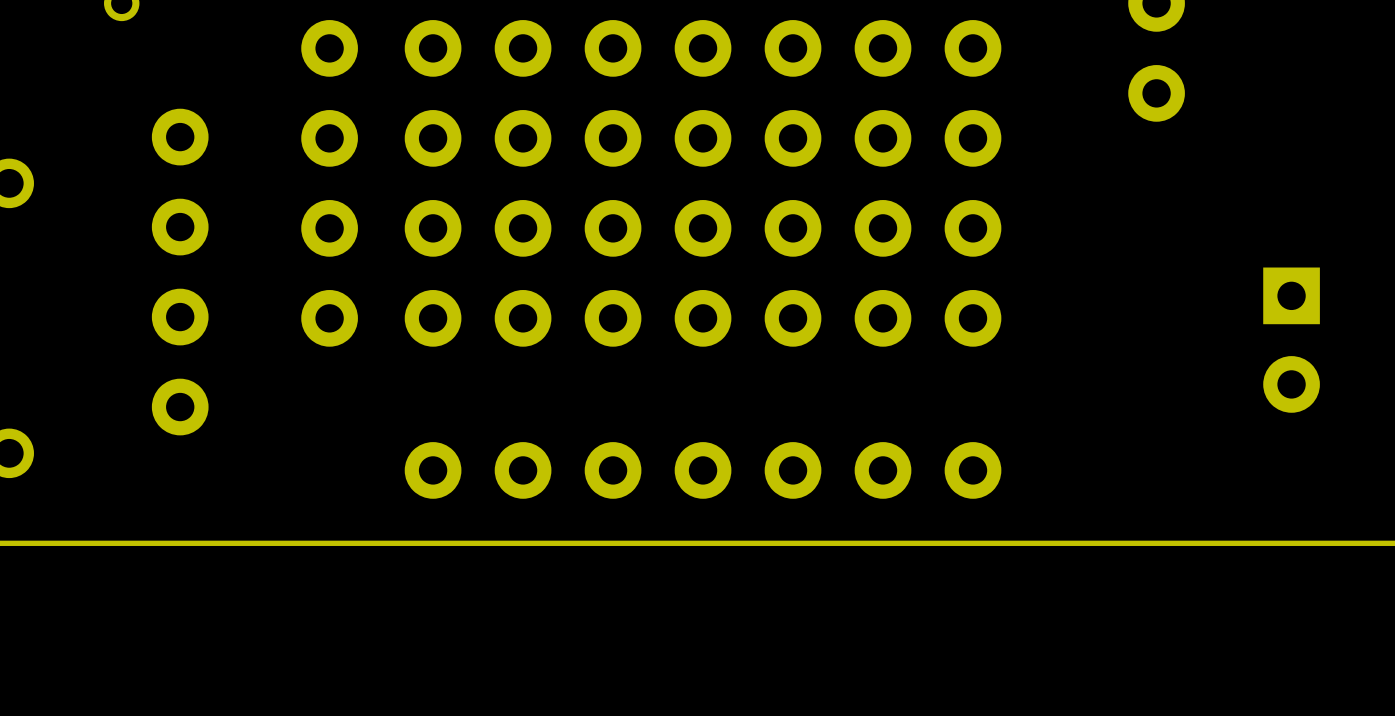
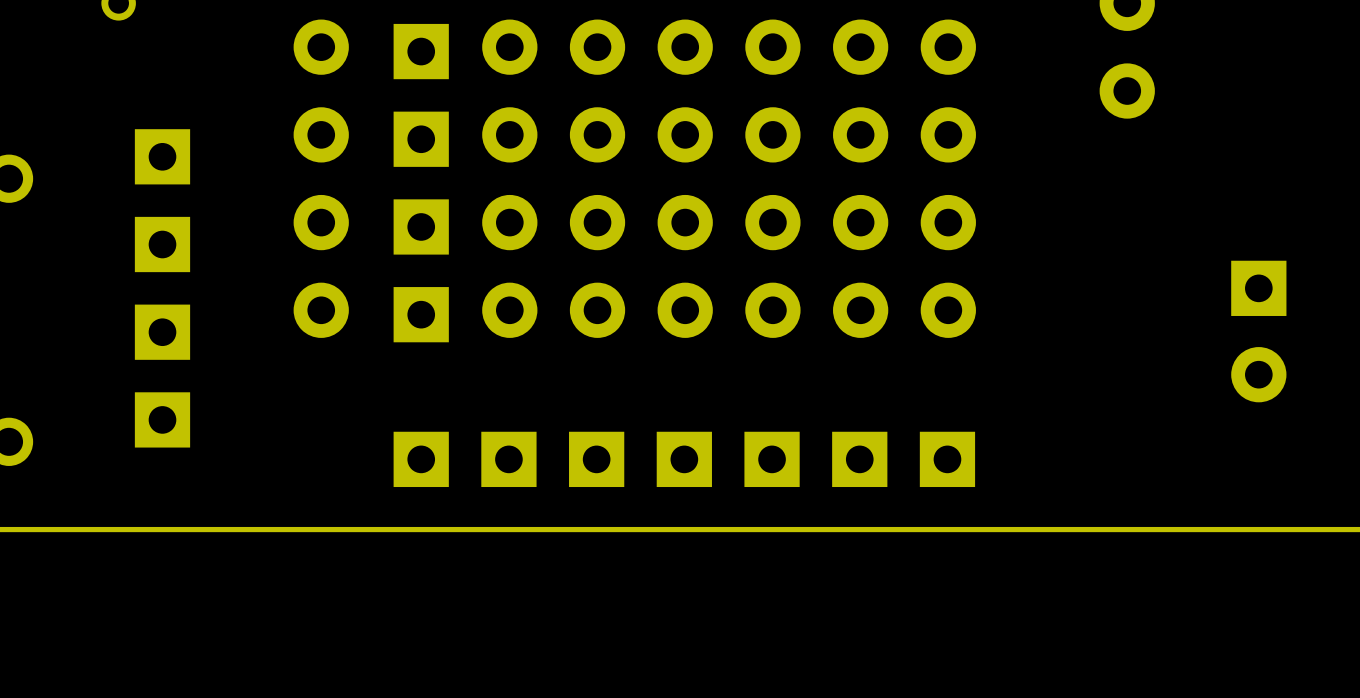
part footprint: [404, 20, 462, 347] -> [393, 23, 449, 343]
part footprint: [151, 108, 209, 436] -> [134, 129, 191, 448]
part footprint: [404, 442, 1002, 499] -> [393, 431, 976, 488]

